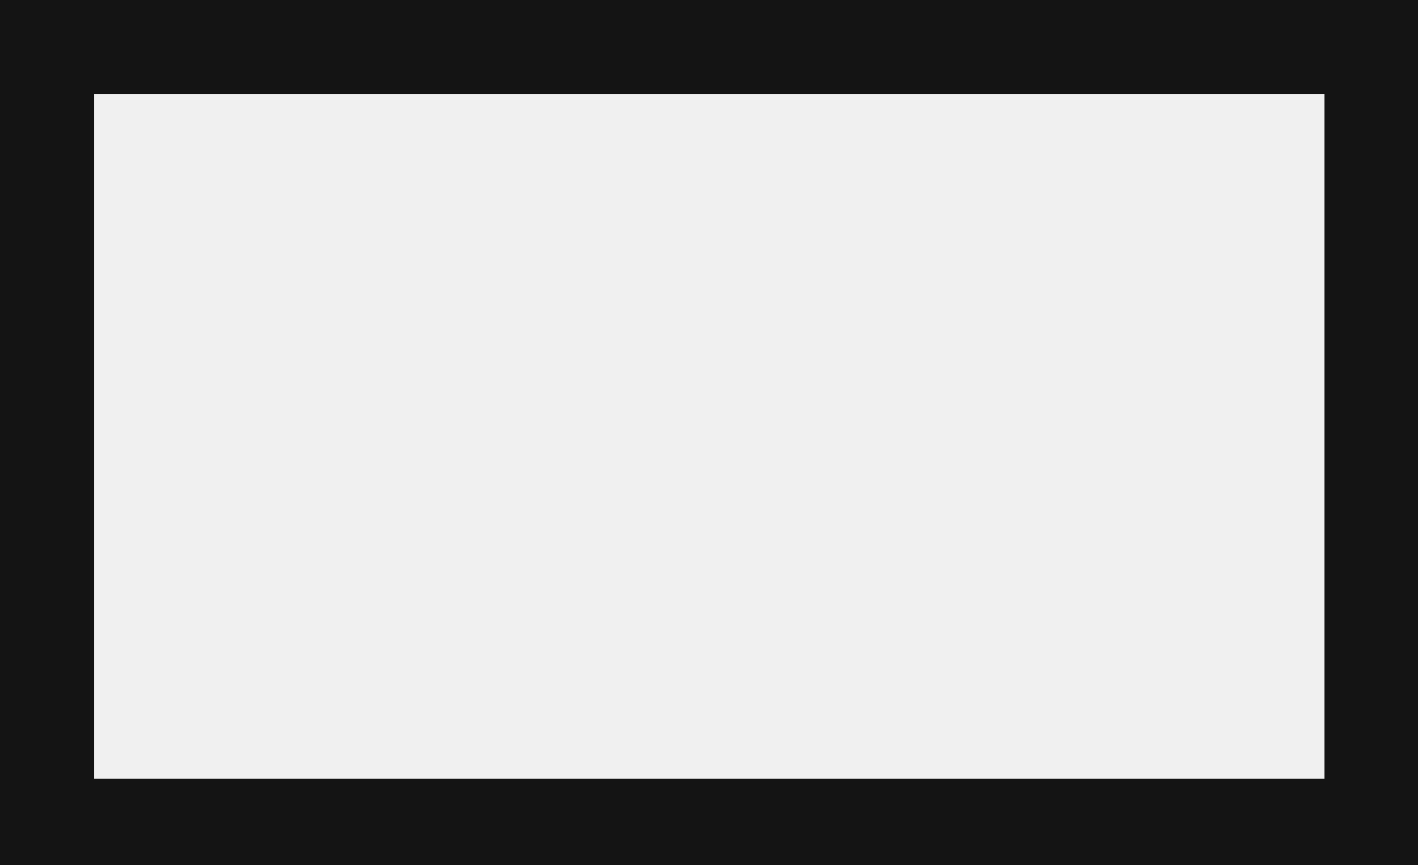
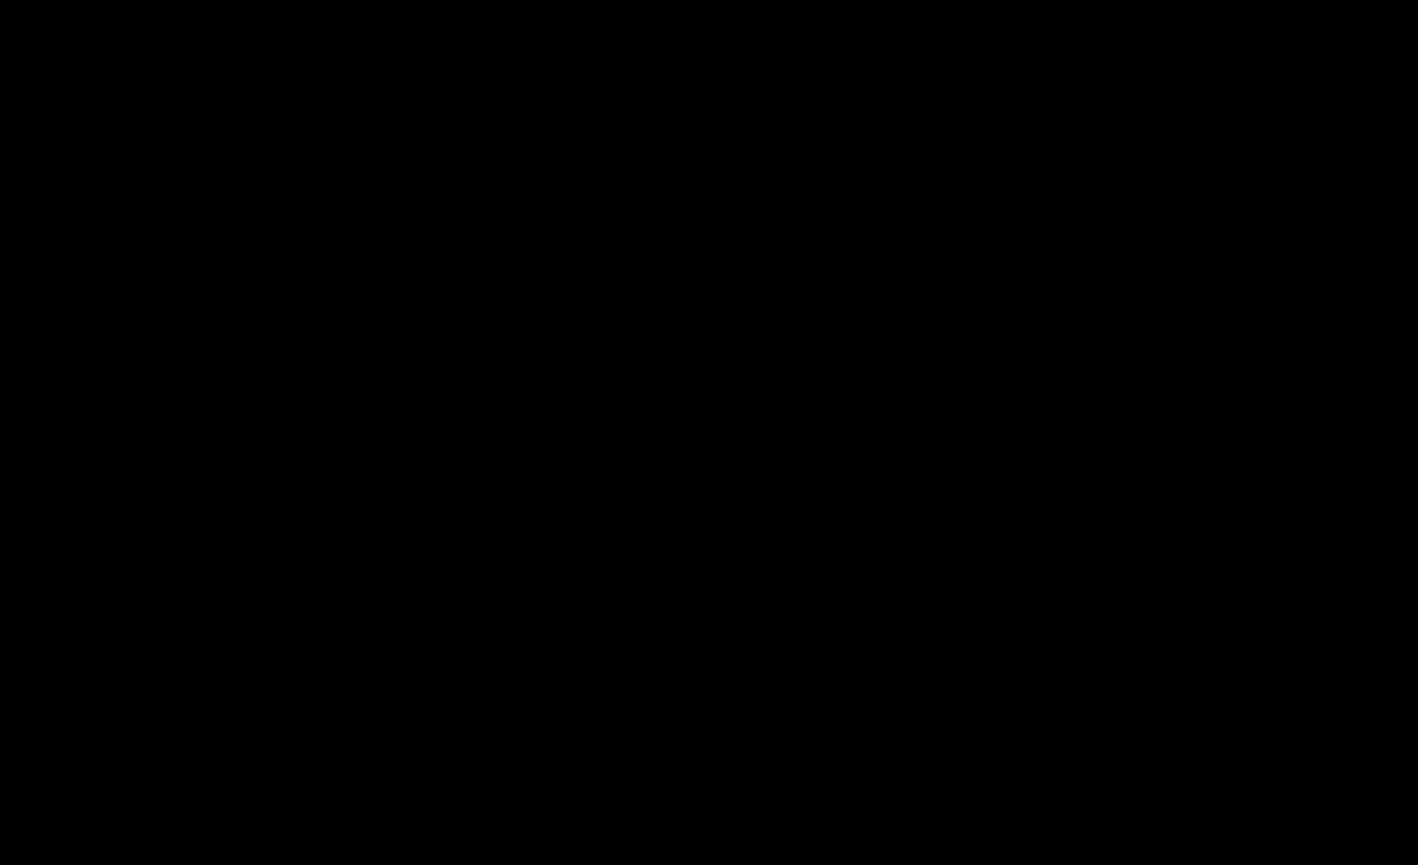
drawing: [94, 94, 1325, 779] -> none

